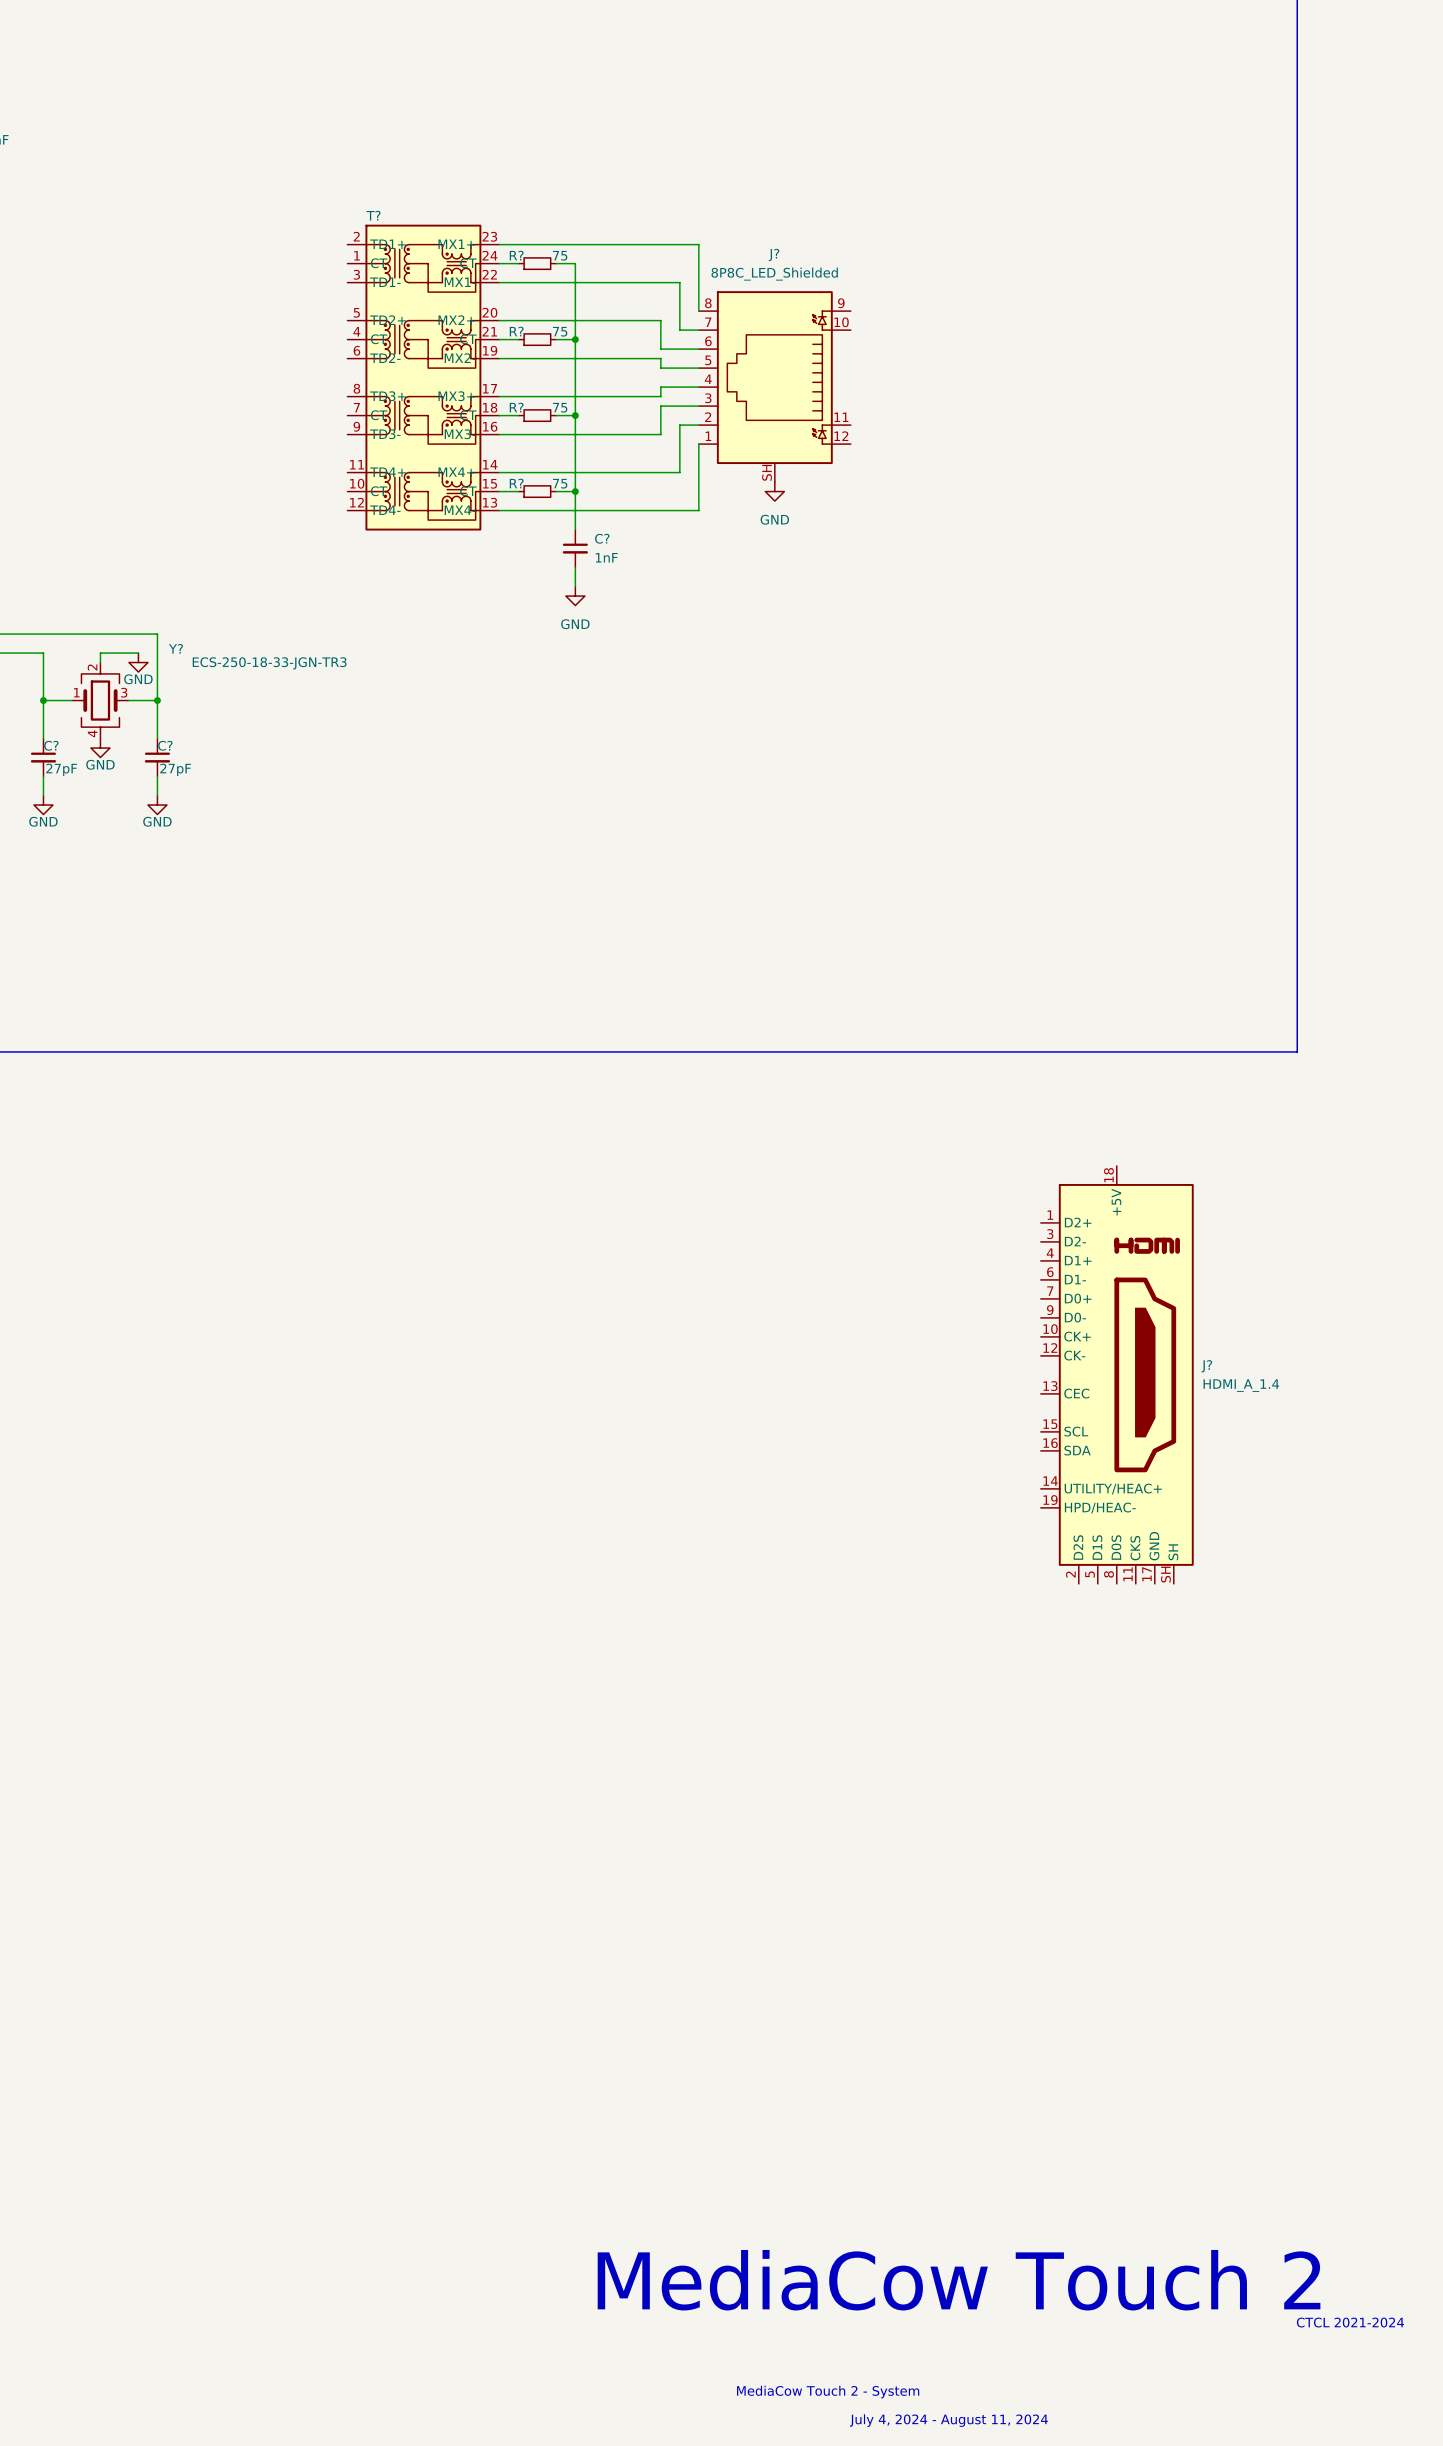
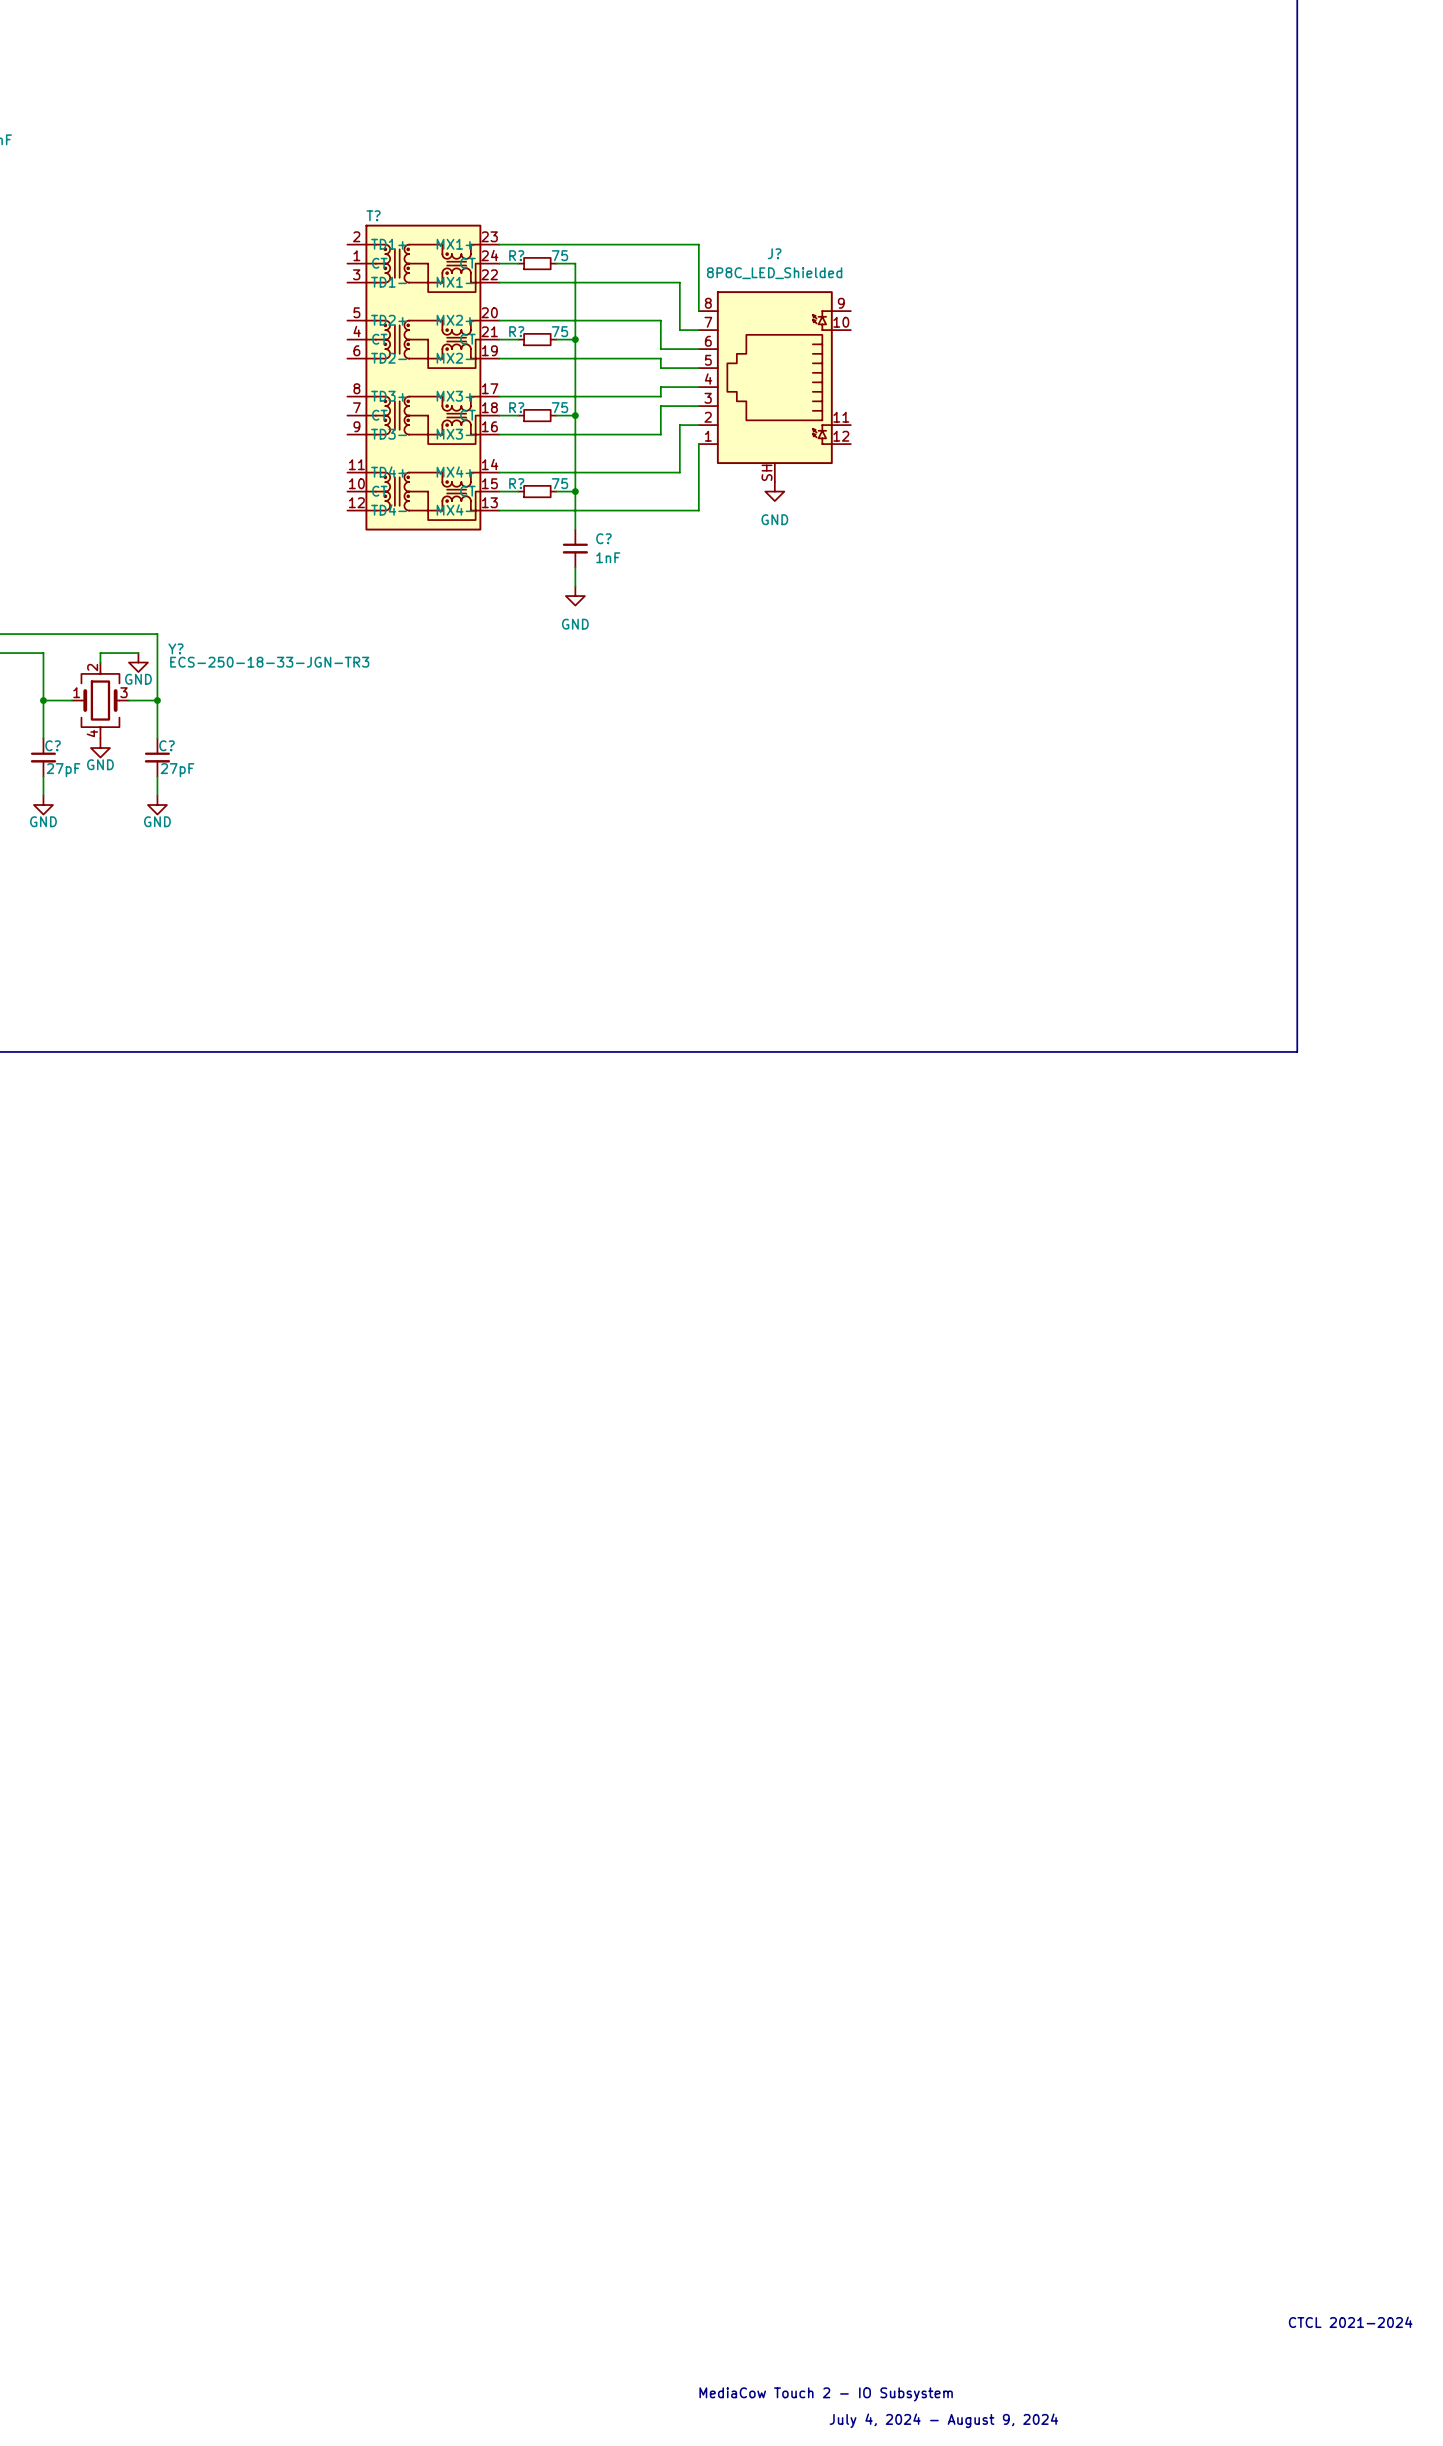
J?: HDMI_A_1.4 (1117, 1374) -> none
text: MediaCow Touch 2 (959, 2280) -> none
text: MediaCow Touch 2 - System (828, 2392) -> MediaCow Touch 2 - IO Subsystem (826, 2394)
text: July 4, 2024 - August 11, 2024 (948, 2420) -> July 4, 2024 - August 9, 2024 (943, 2420)

